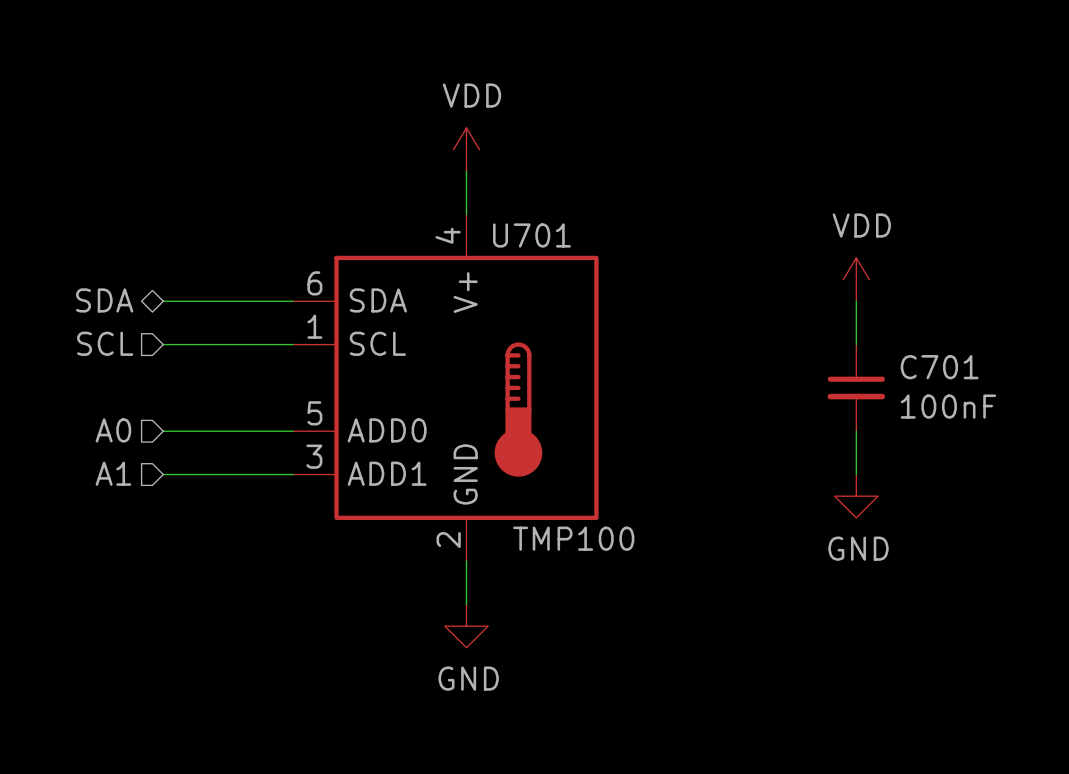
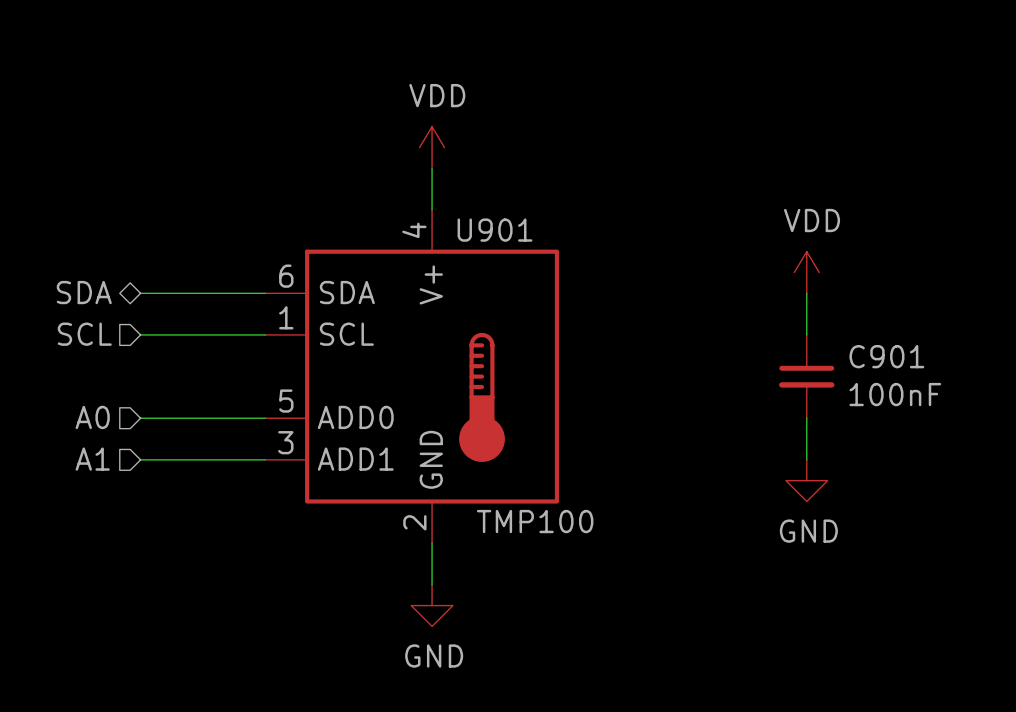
U701 name: U701 (531, 235) -> U901 (495, 230)
C701 name: C701 (939, 367) -> C901 (886, 356)

